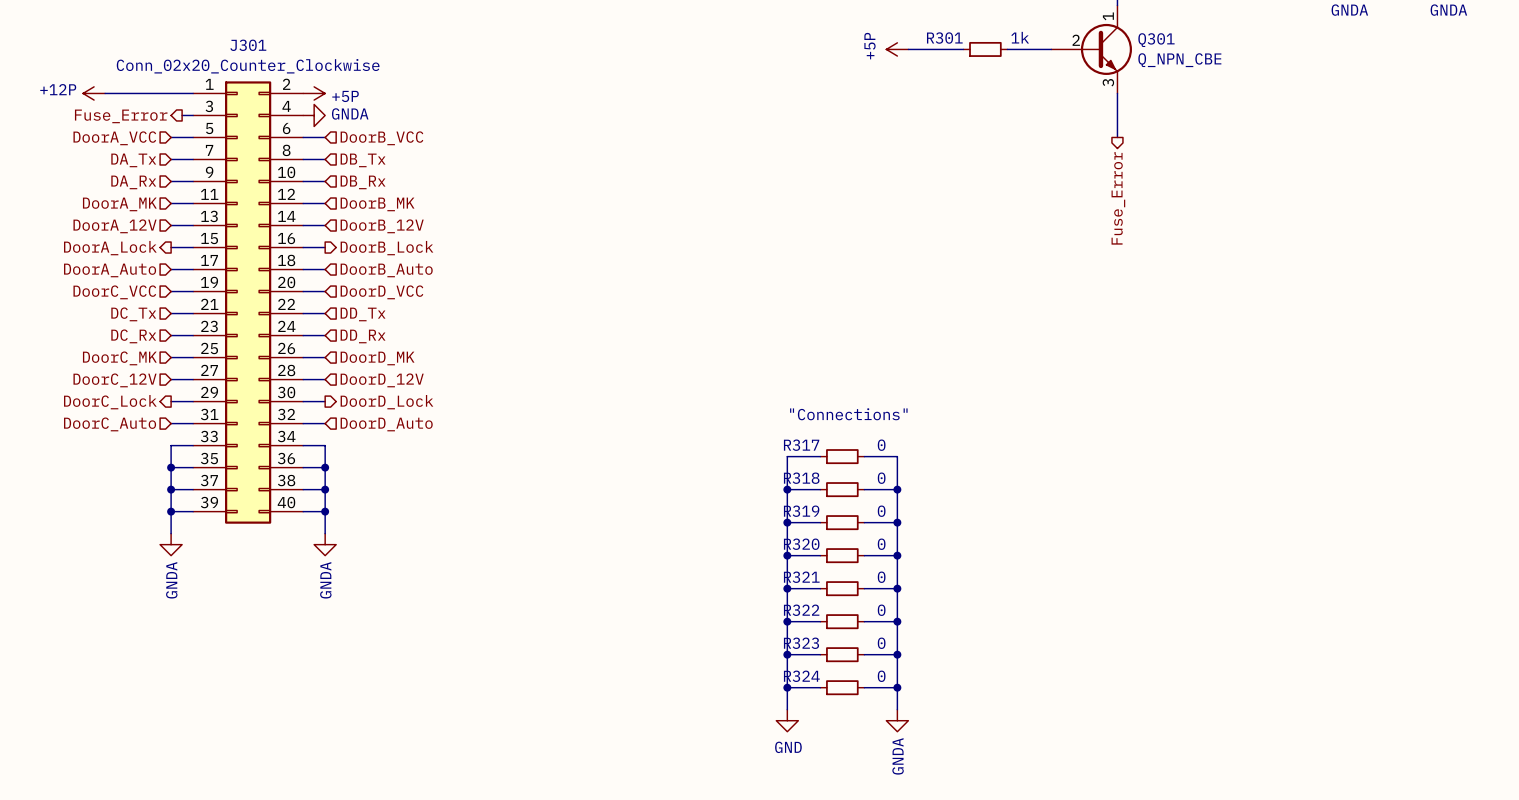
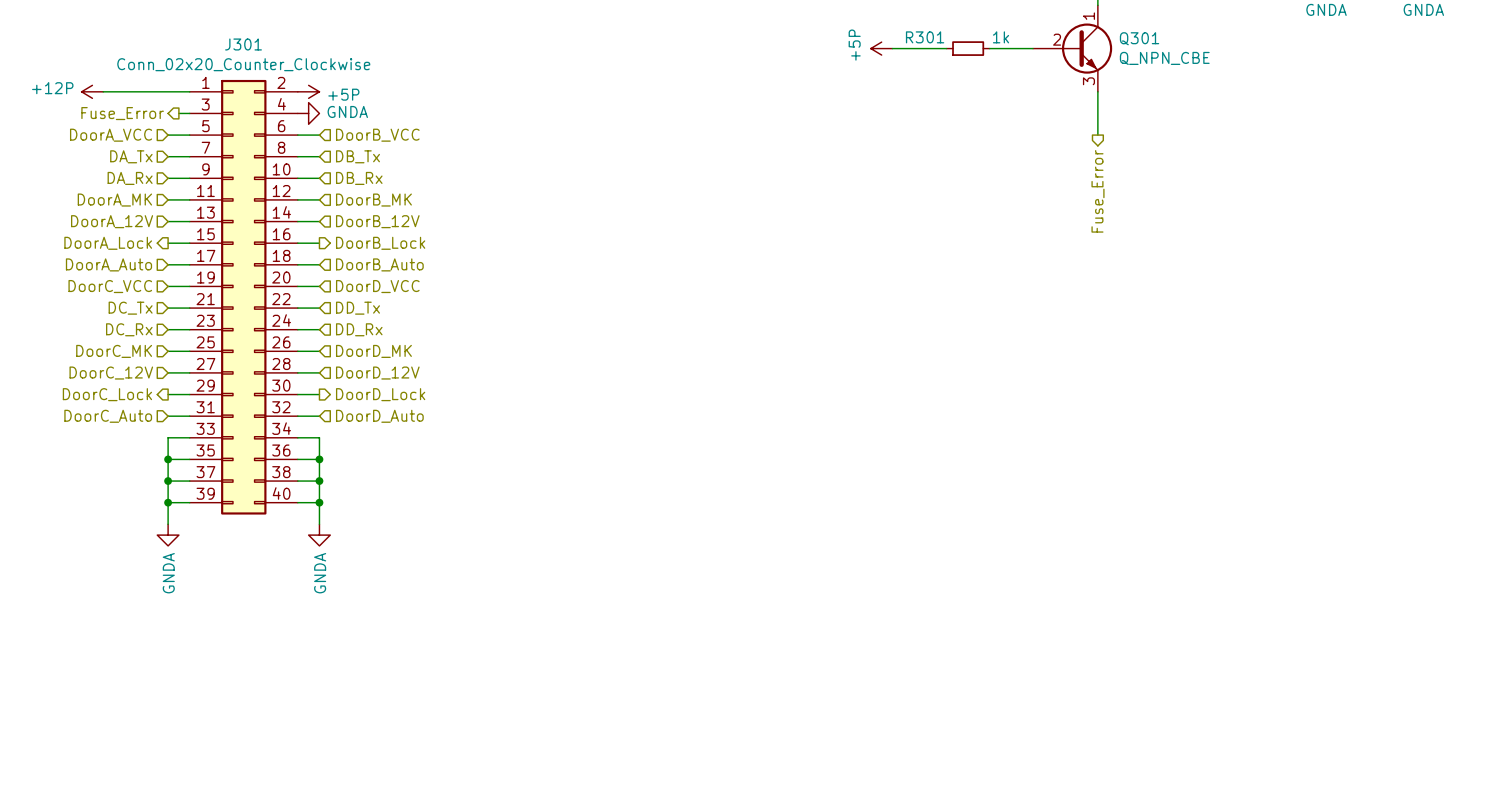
text: "Connections" (848, 414) -> none
wire: (820, 456) (787, 456) (787, 709) -> none
R317: 0 (842, 456) -> none
wire: (864, 456) (897, 456) (897, 709) -> none
wire: (787, 489) (820, 489) -> none
junction: (787, 489) -> none
R318: 0 (842, 489) -> none
wire: (864, 489) (897, 489) -> none
junction: (897, 489) -> none
wire: (787, 522) (820, 522) -> none
junction: (787, 522) -> none
R319: 0 (842, 522) -> none
wire: (864, 522) (897, 522) -> none
junction: (897, 522) -> none
wire: (787, 555) (820, 555) -> none
junction: (787, 555) -> none
R320: 0 (842, 555) -> none
wire: (864, 555) (897, 555) -> none
junction: (897, 555) -> none
wire: (787, 588) (820, 588) -> none
junction: (787, 588) -> none
R321: 0 (842, 588) -> none
wire: (864, 588) (897, 588) -> none
junction: (897, 588) -> none
wire: (787, 621) (820, 621) -> none
junction: (787, 621) -> none
R322: 0 (842, 621) -> none
wire: (864, 621) (897, 621) -> none
junction: (897, 621) -> none
wire: (787, 654) (820, 654) -> none
junction: (787, 654) -> none
R323: 0 (842, 654) -> none
wire: (864, 654) (897, 654) -> none
junction: (897, 654) -> none
wire: (787, 687) (820, 687) -> none
junction: (787, 687) -> none
R324: 0 (842, 687) -> none
wire: (864, 687) (897, 687) -> none
junction: (897, 687) -> none
power symbol: GND (787, 720) -> none
power symbol: GNDA (897, 720) -> none

